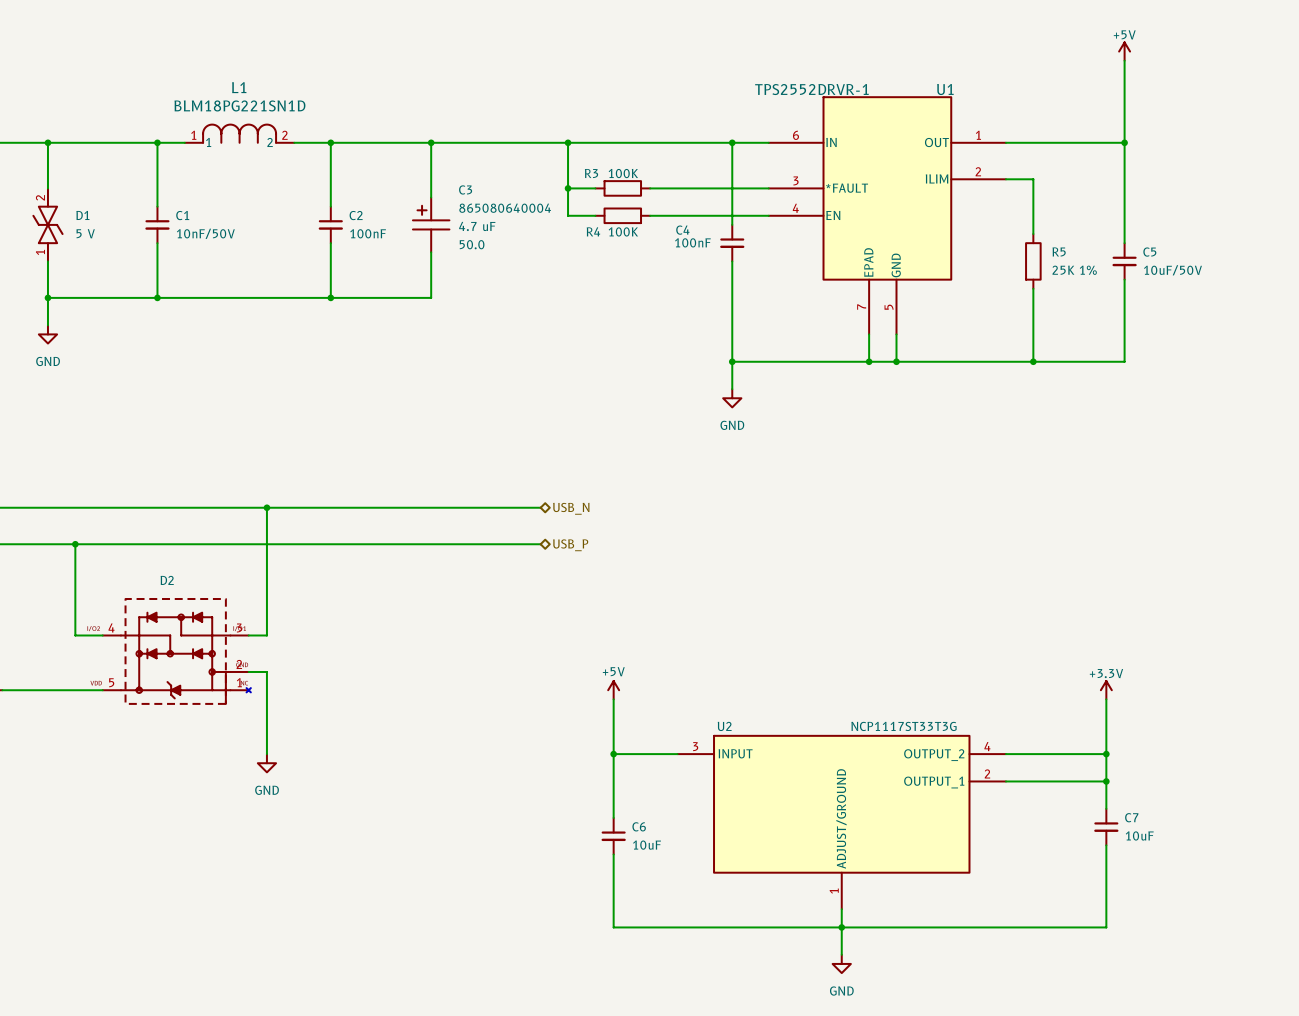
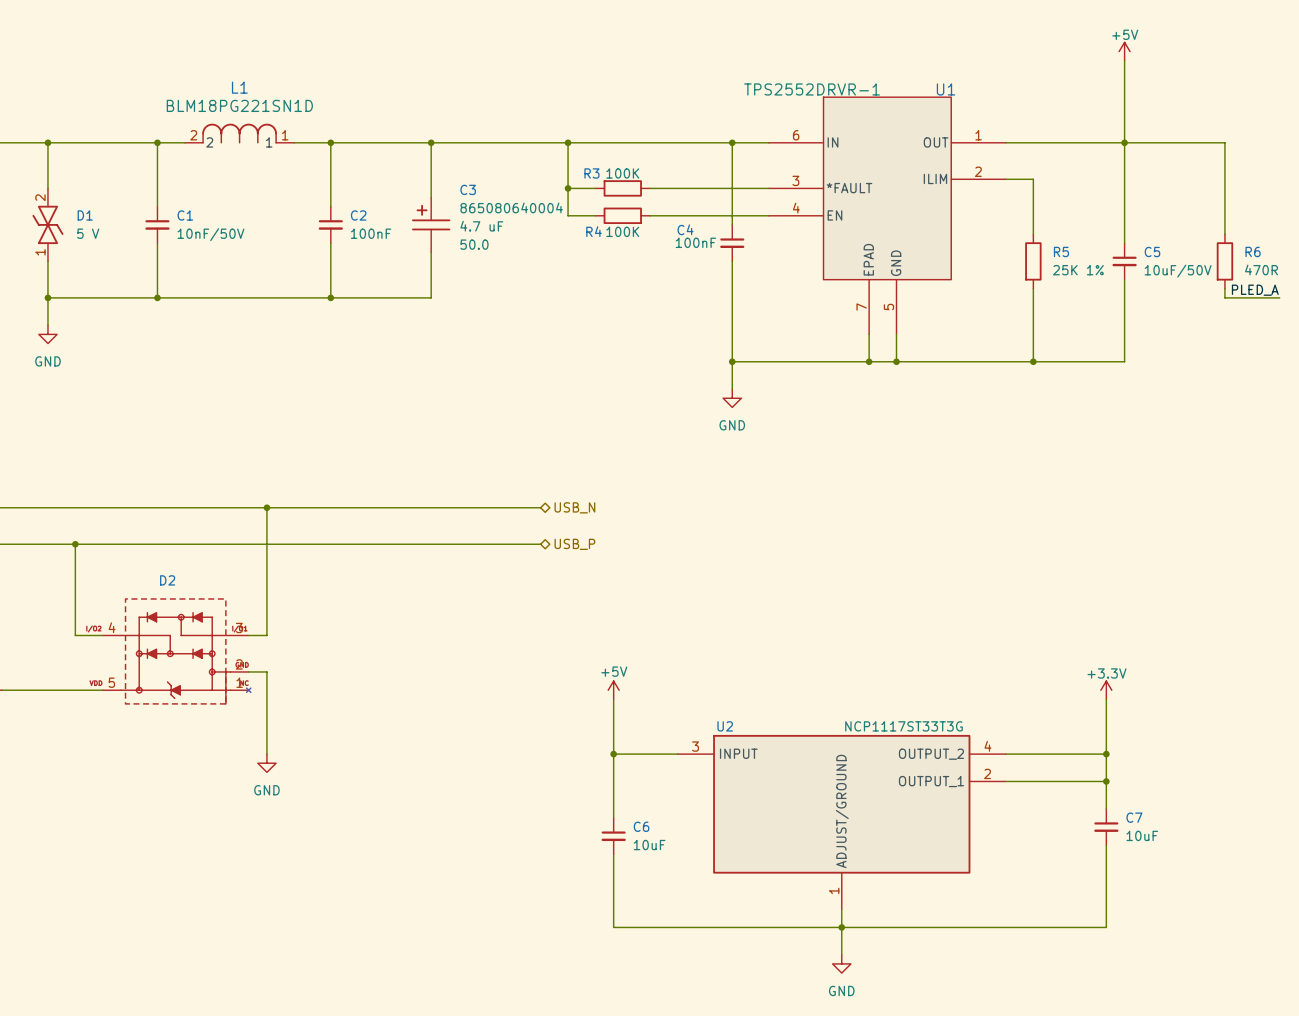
L1 flip: as is (239, 133) -> left-right (239, 133)
wire: none -> (1124, 142) (1224, 142) (1224, 234)
R6: none -> 470R (1224, 261)
wire: none -> (1224, 288) (1224, 297) (1279, 297)
label: none -> PLED_A (1255, 290)

